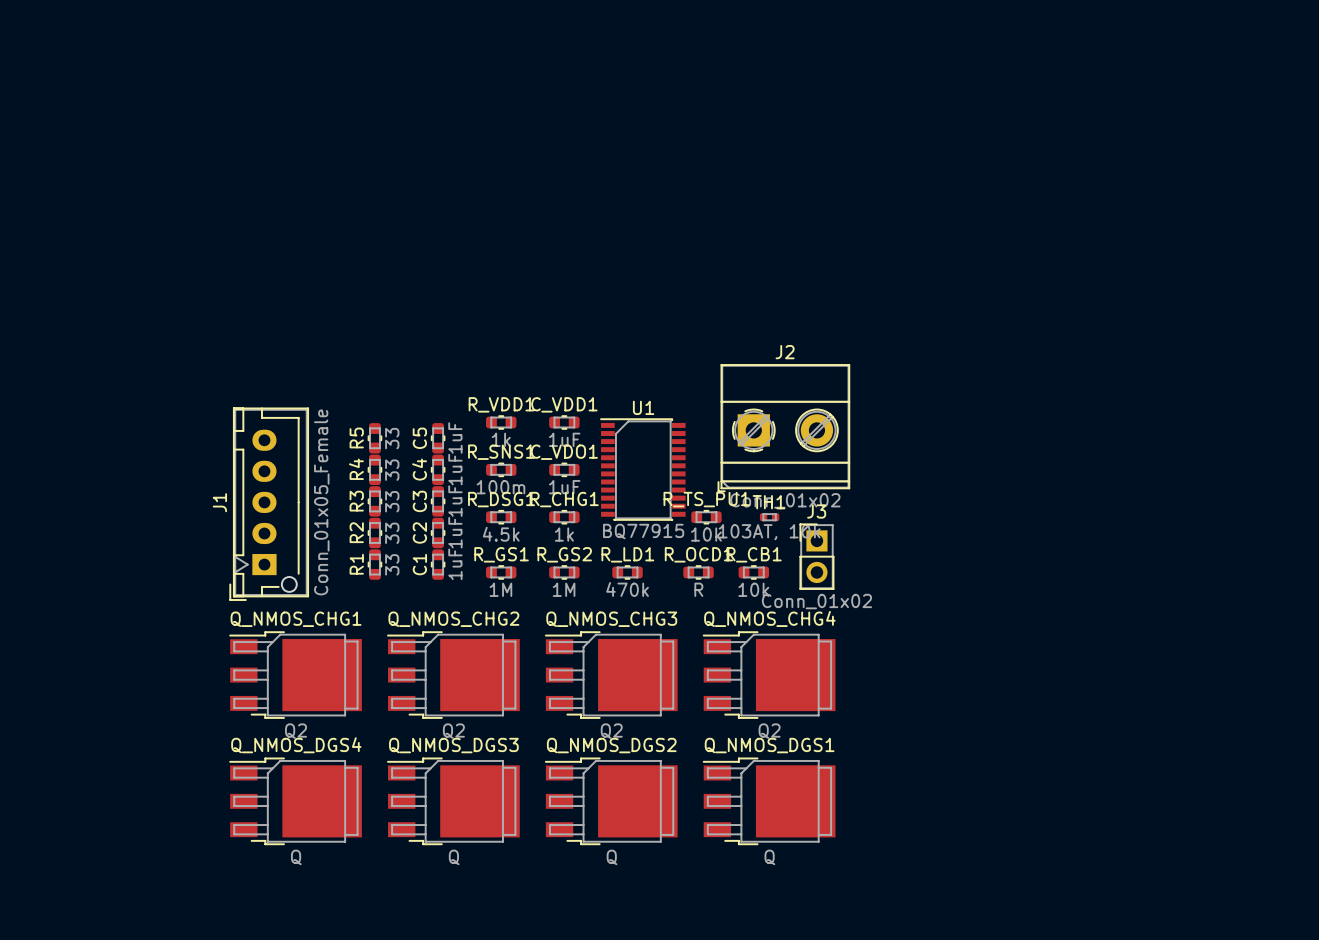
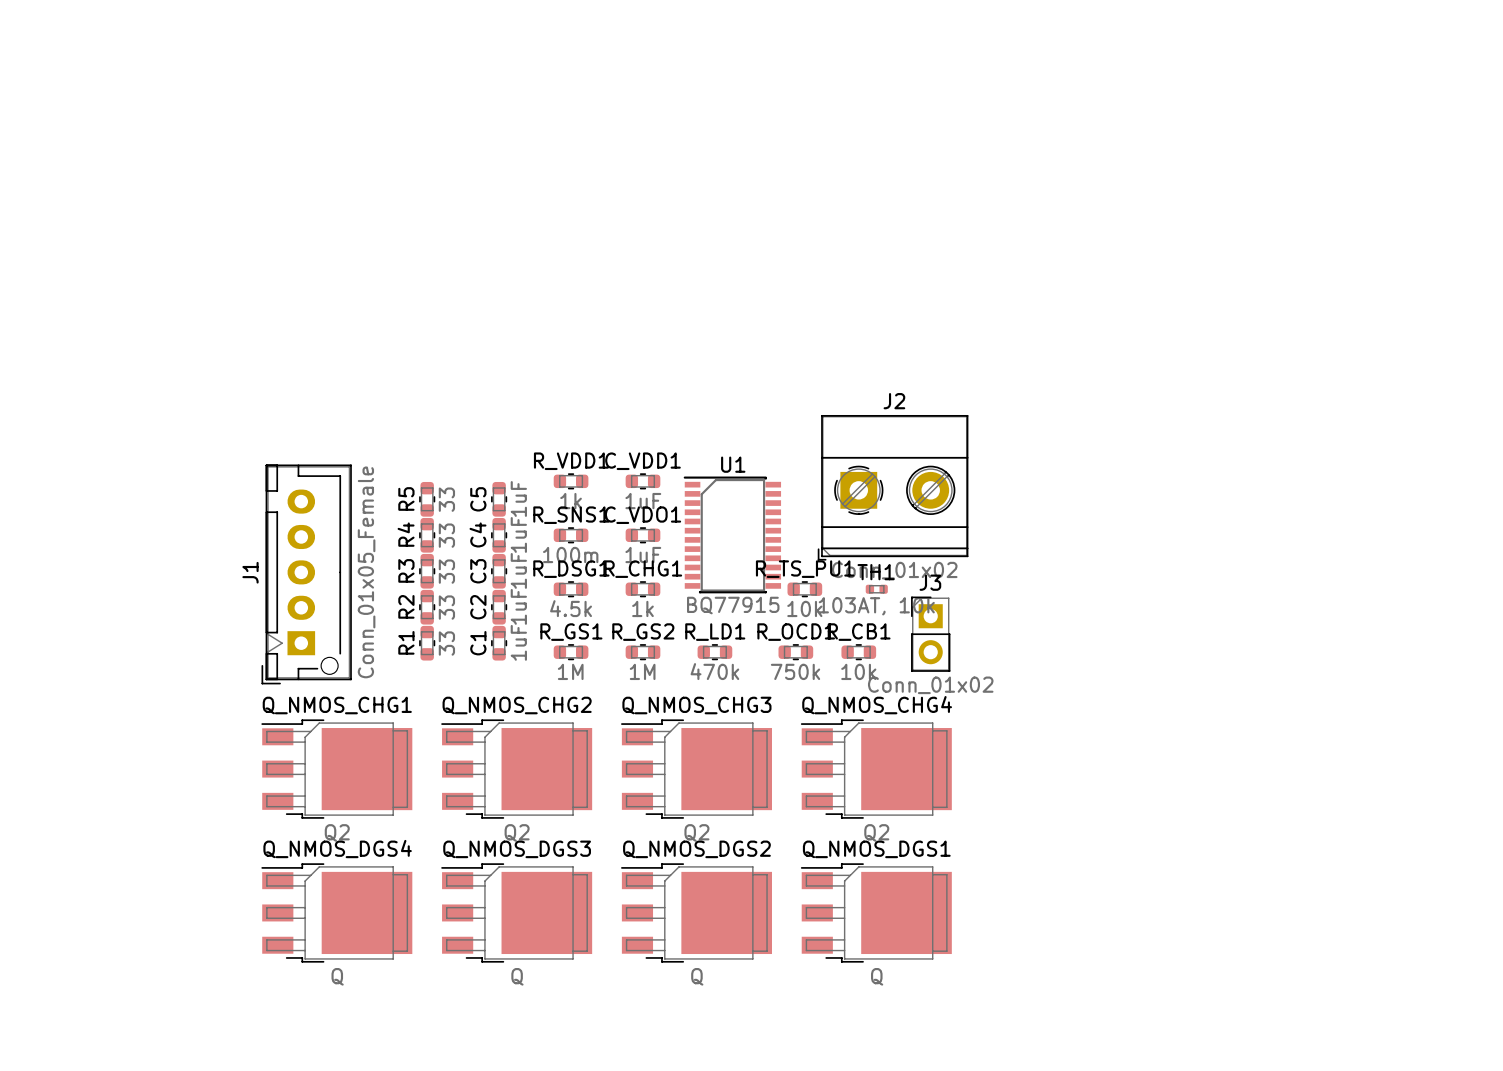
R_OCD1 value: R (698, 589) -> 750k (795, 671)

